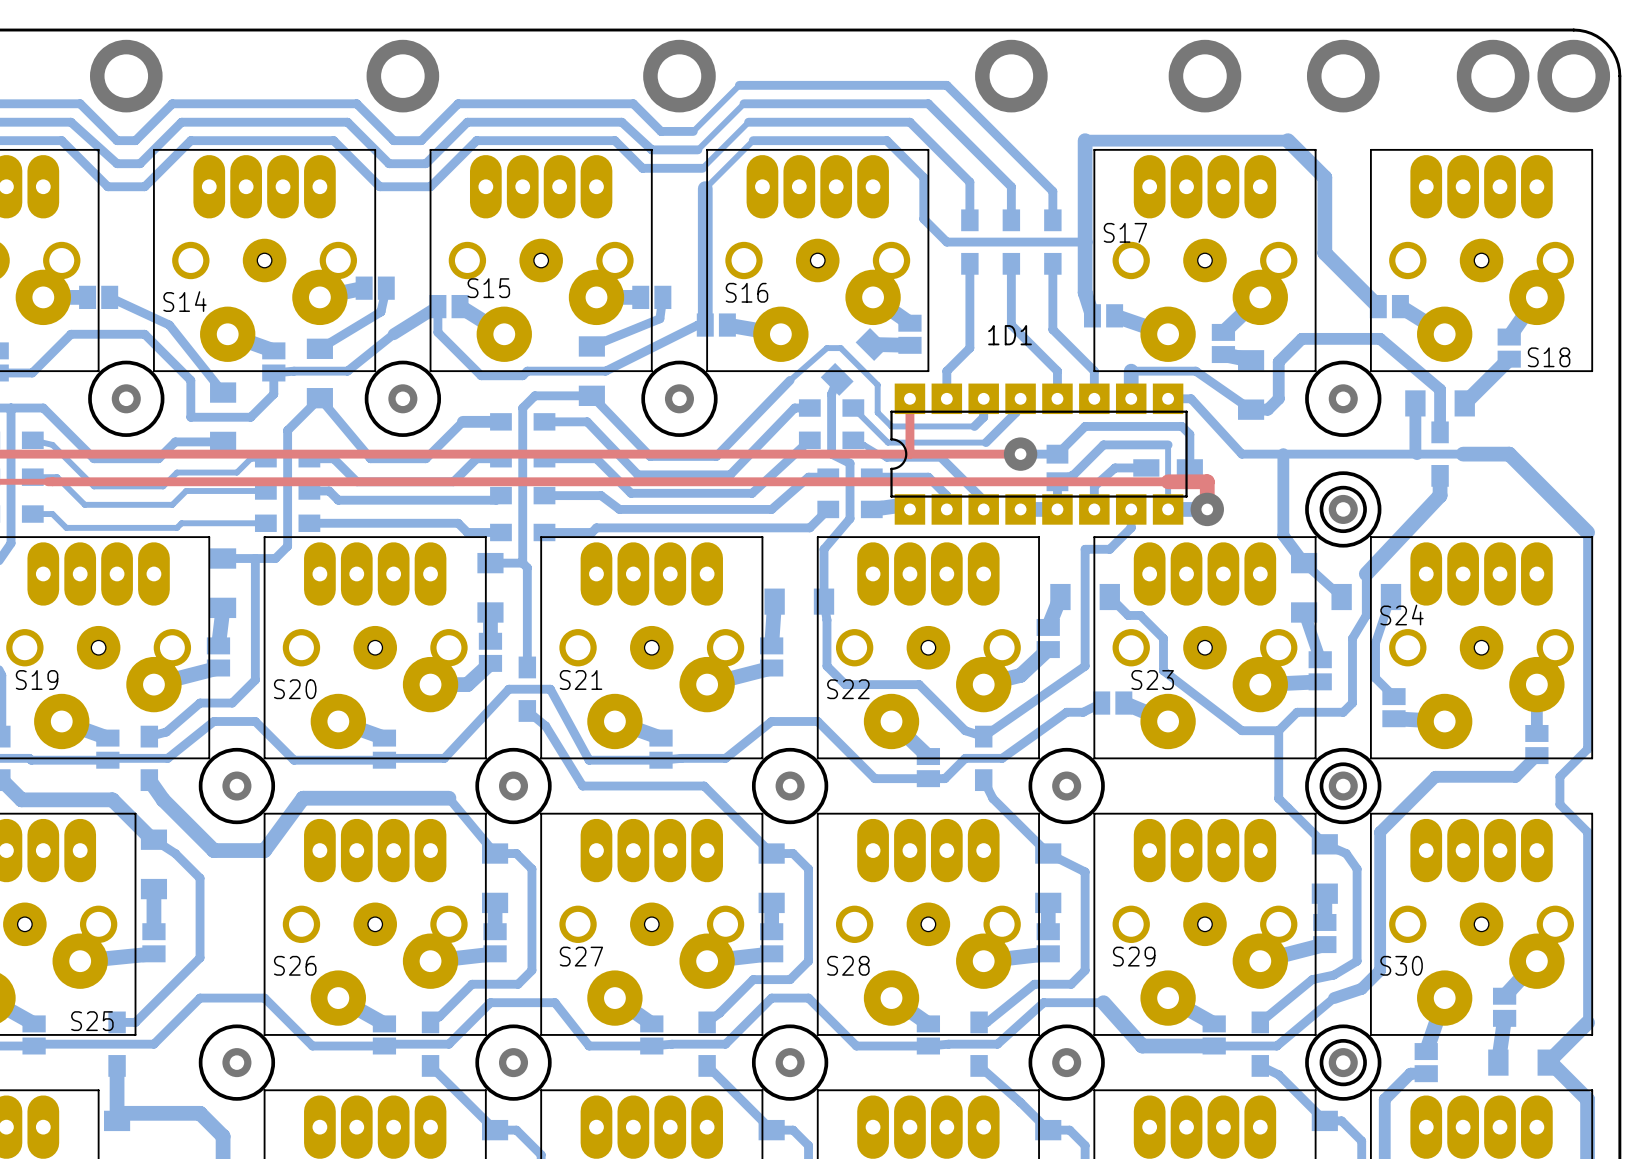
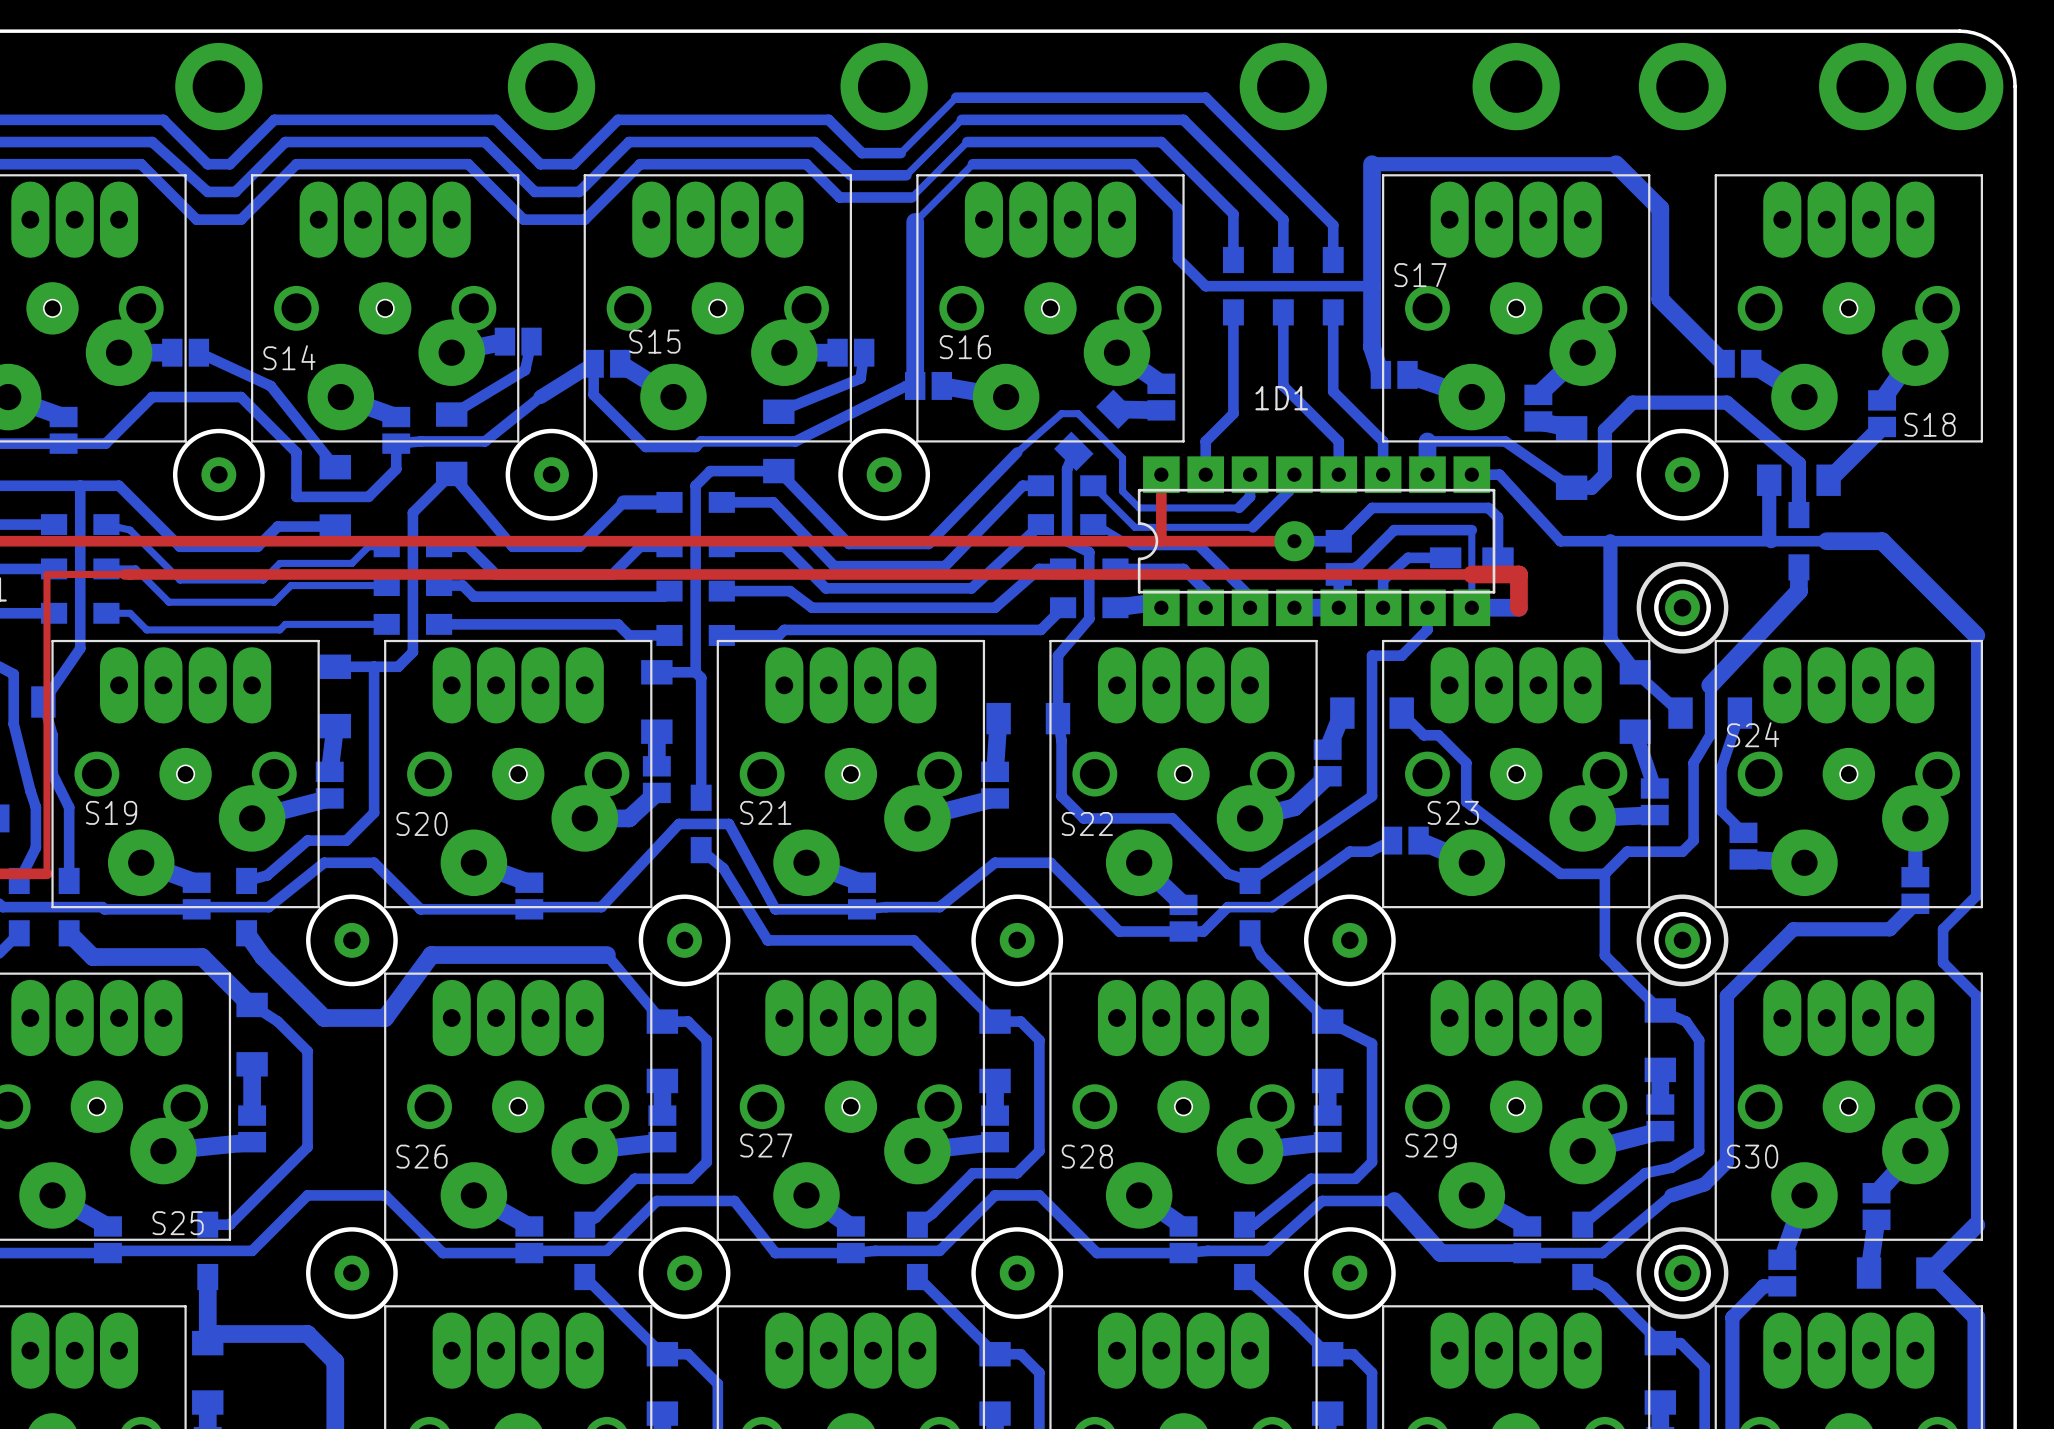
via: (1207, 509) -> none

